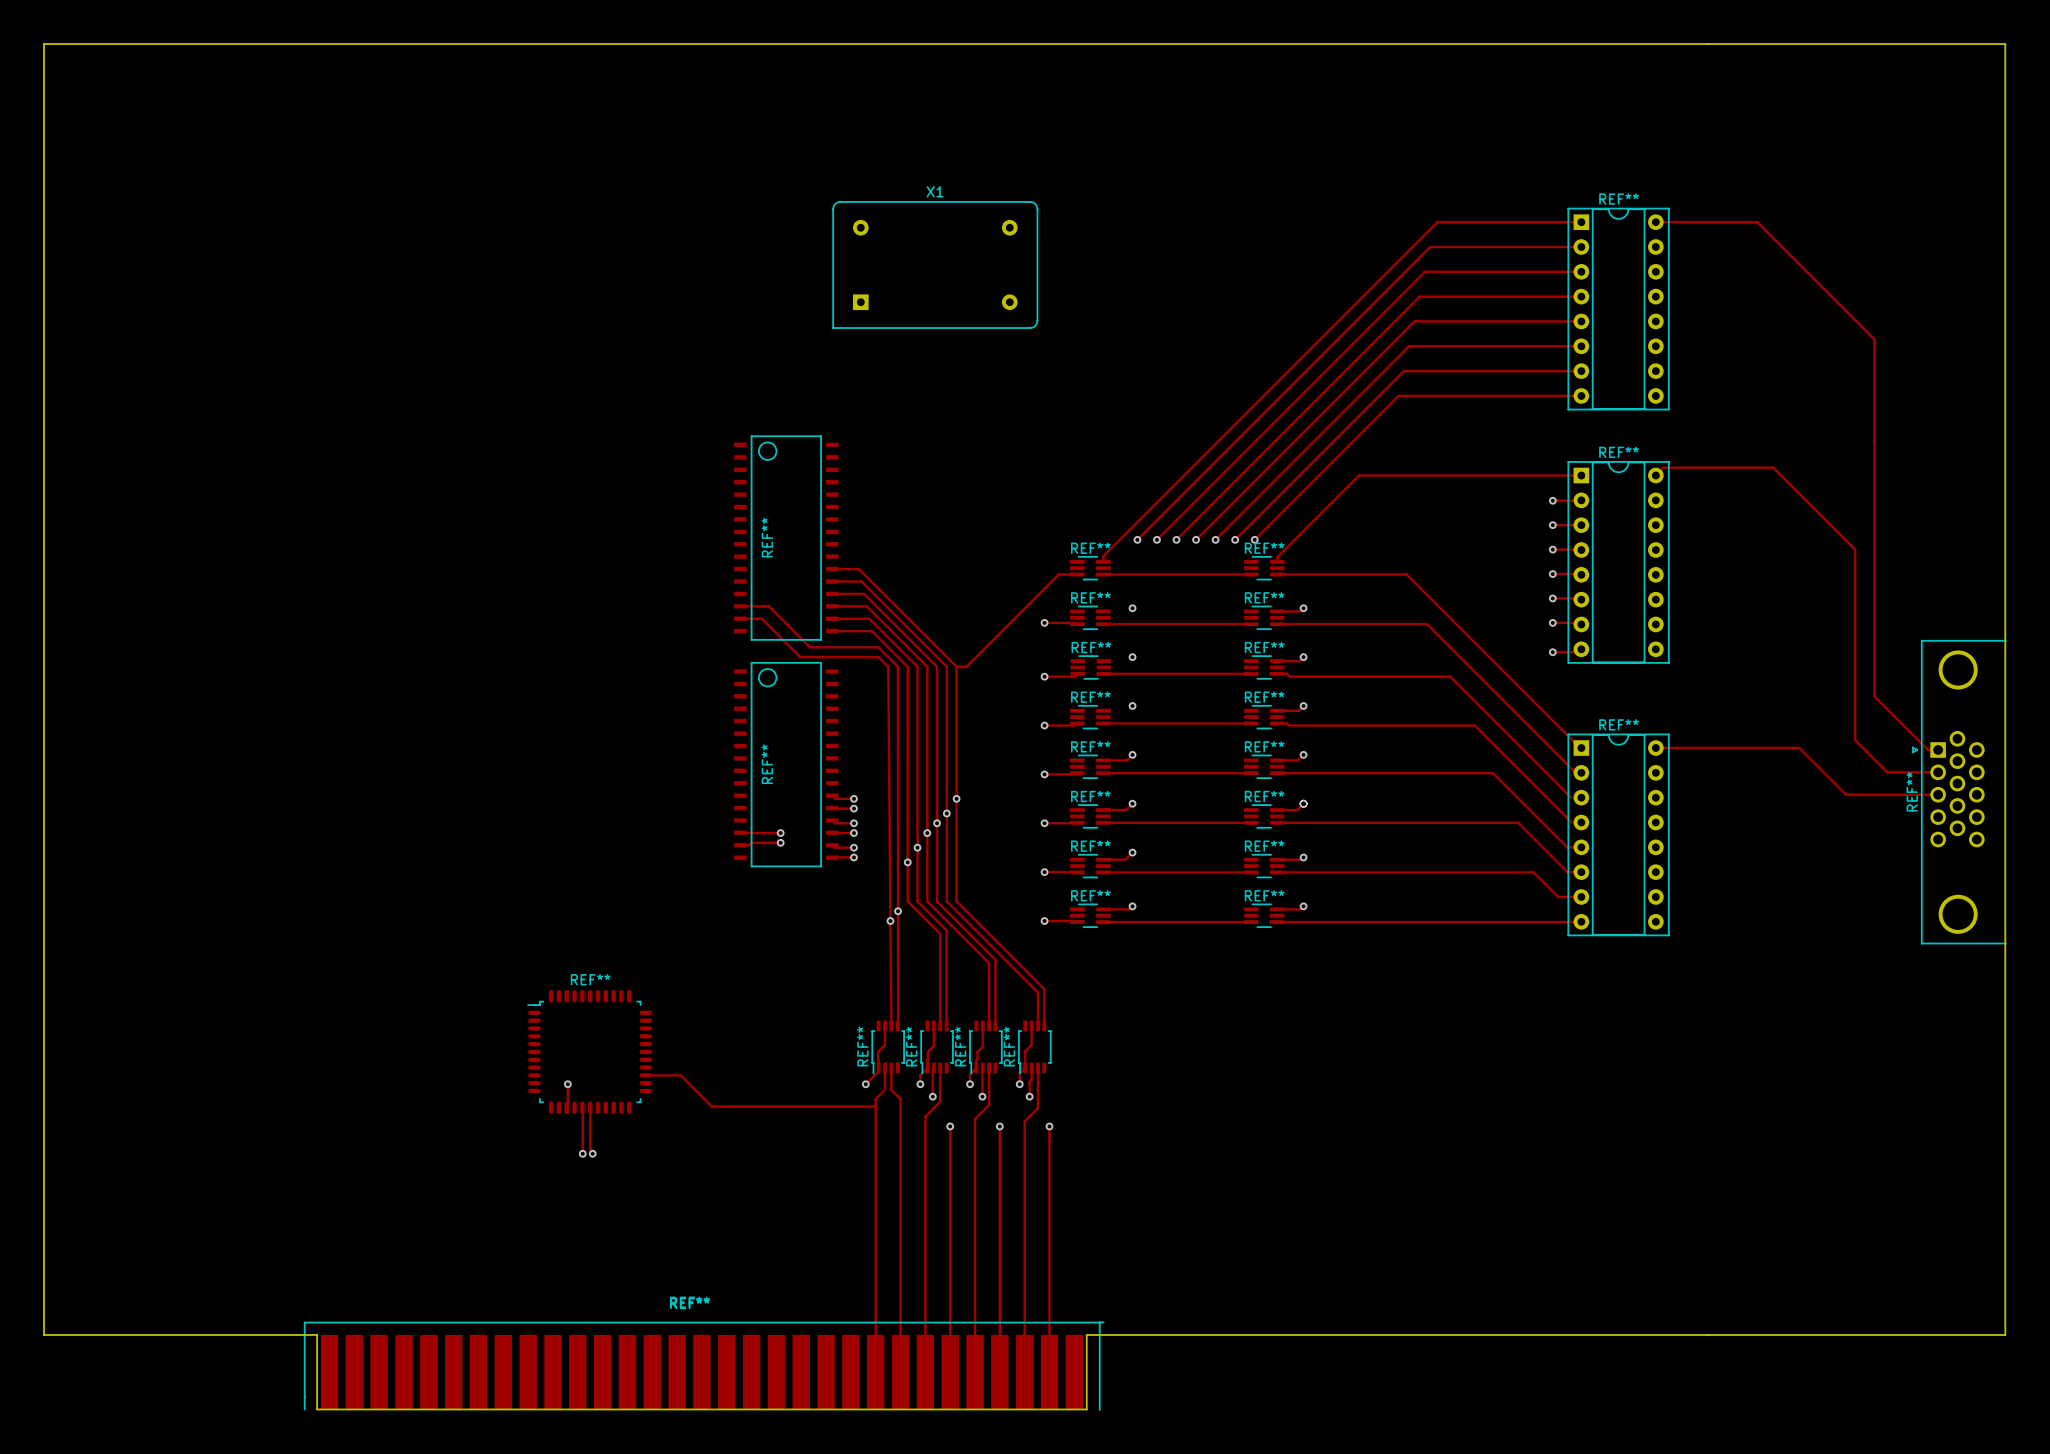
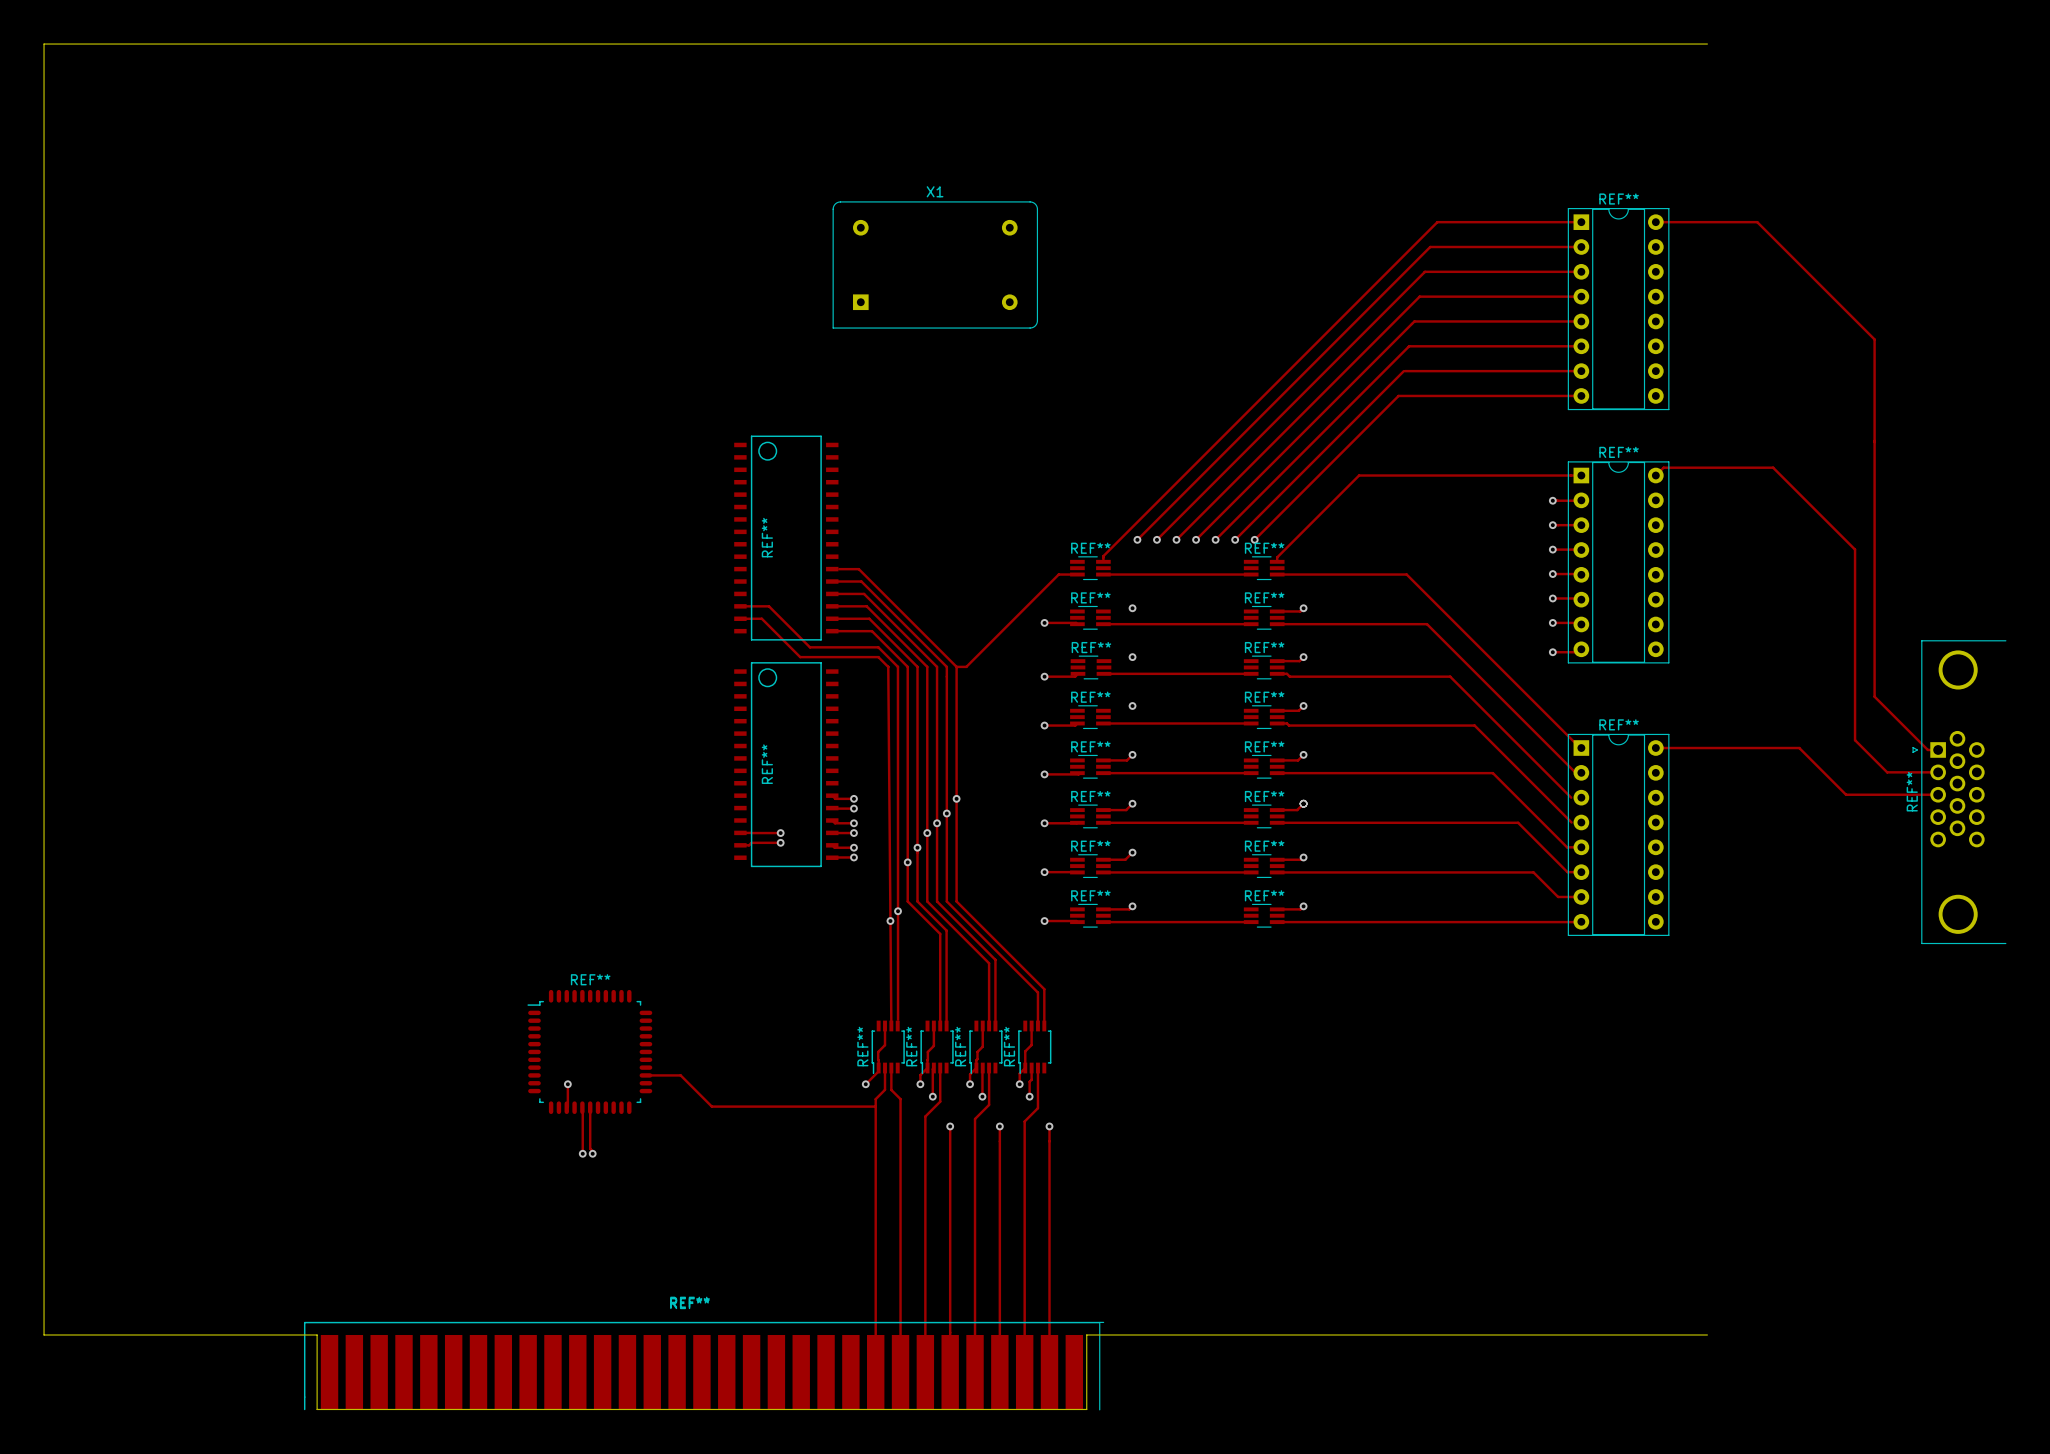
board edge: (1707, 44) (2005, 44) (2005, 1335) (1707, 1335) -> none

